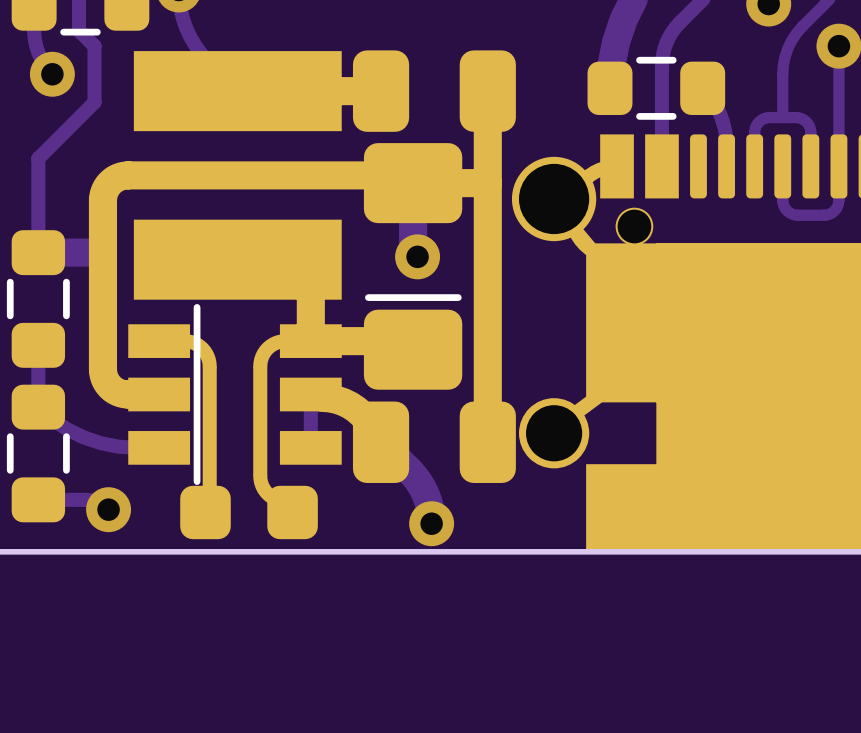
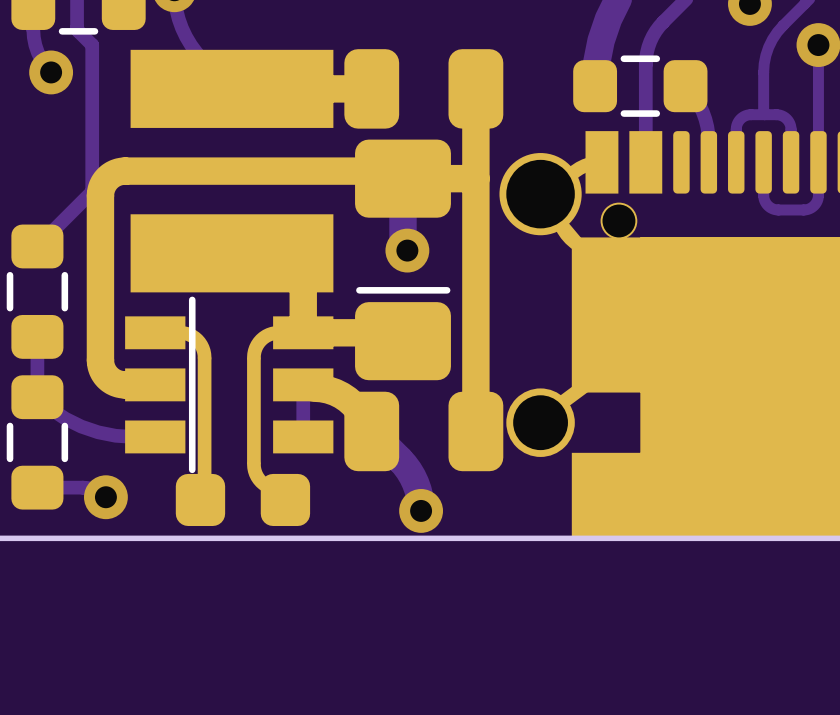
track: (94, 102) (38, 158) (38, 252) (100, 254) -> (92, 99) (92, 191) (37, 246)

